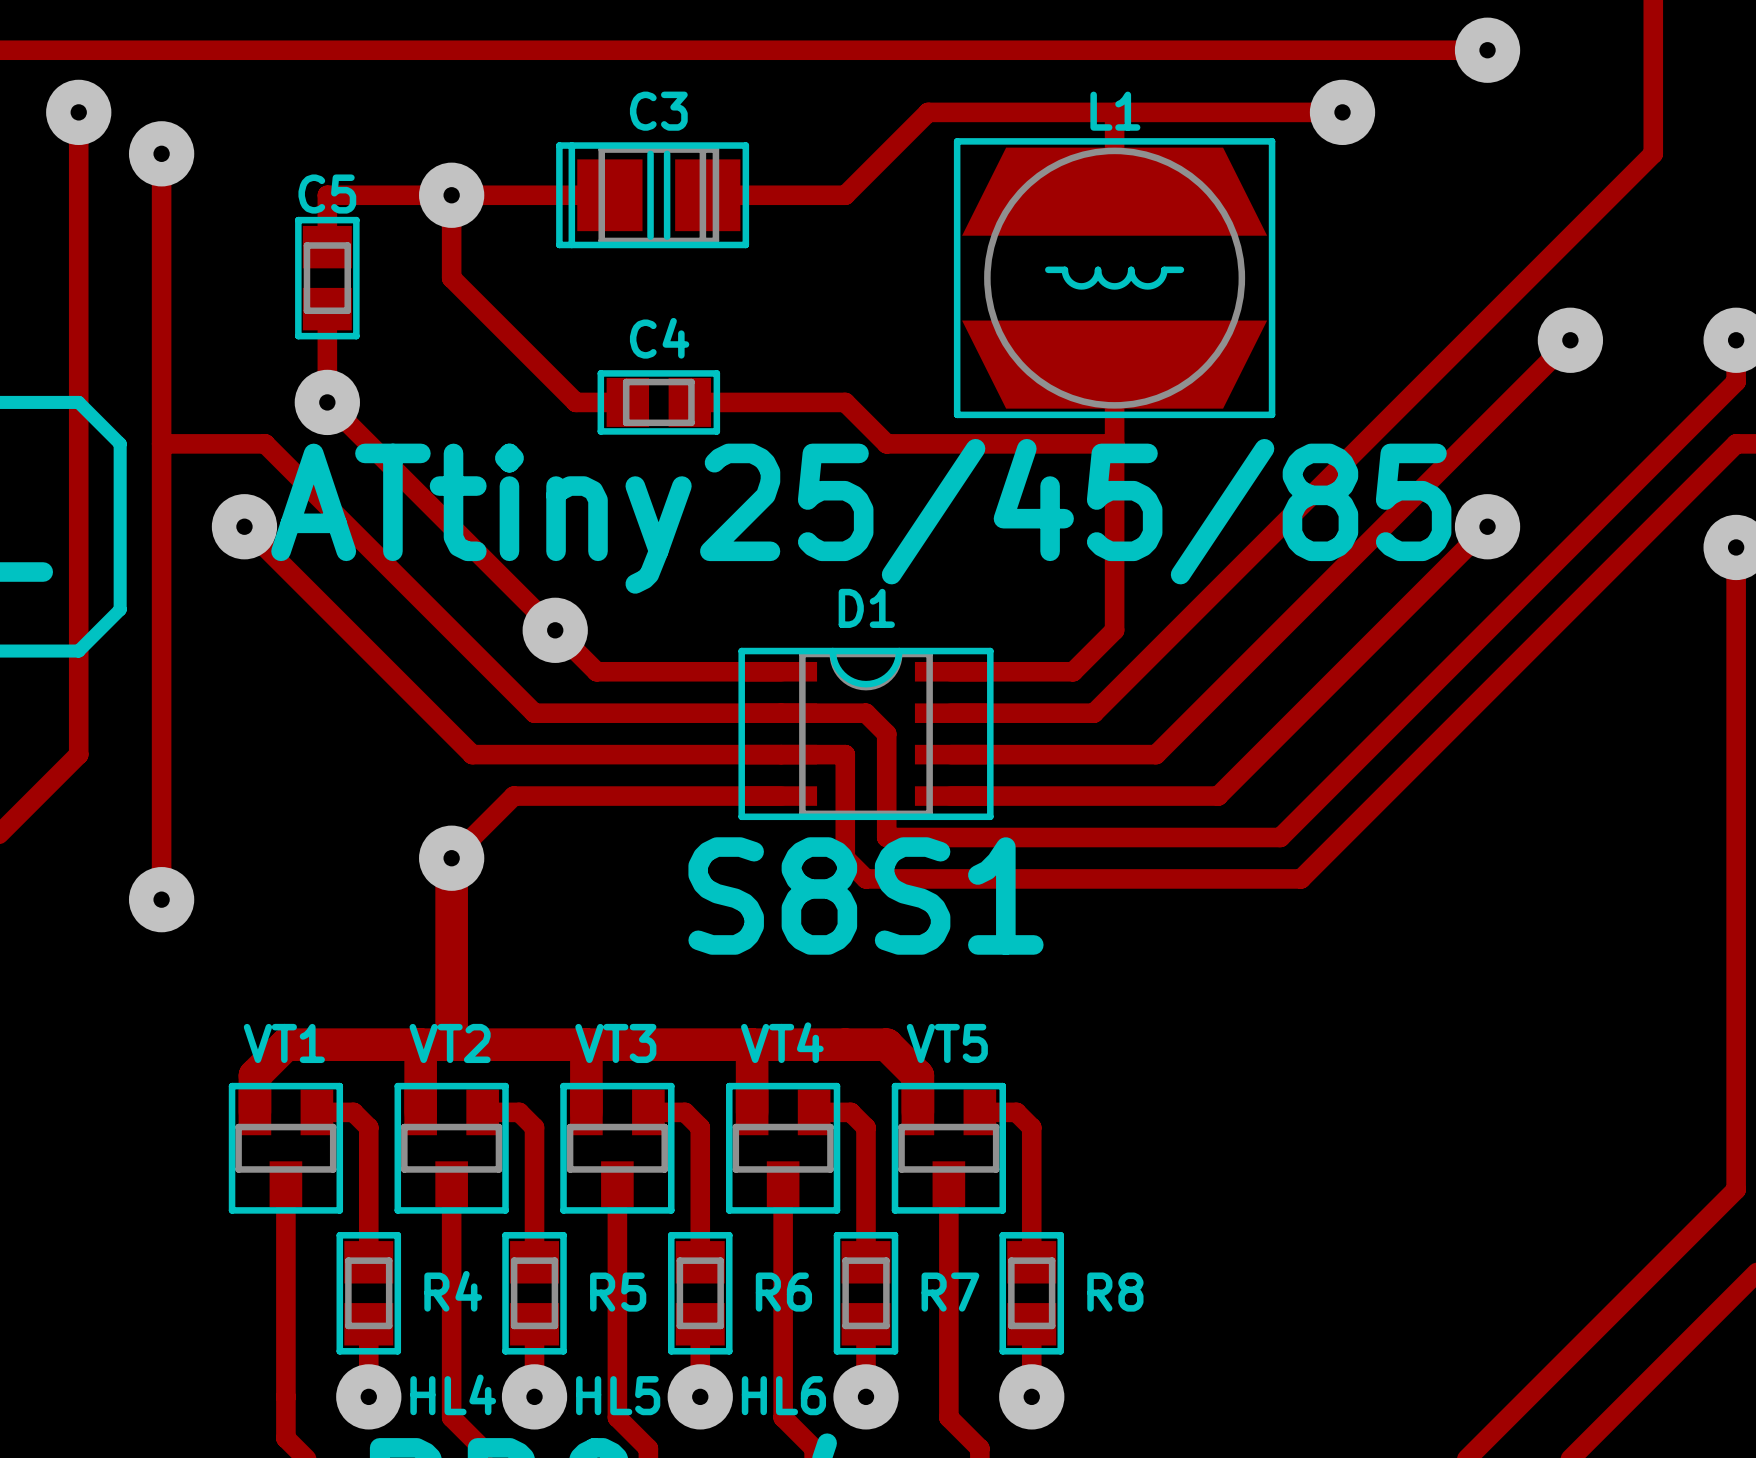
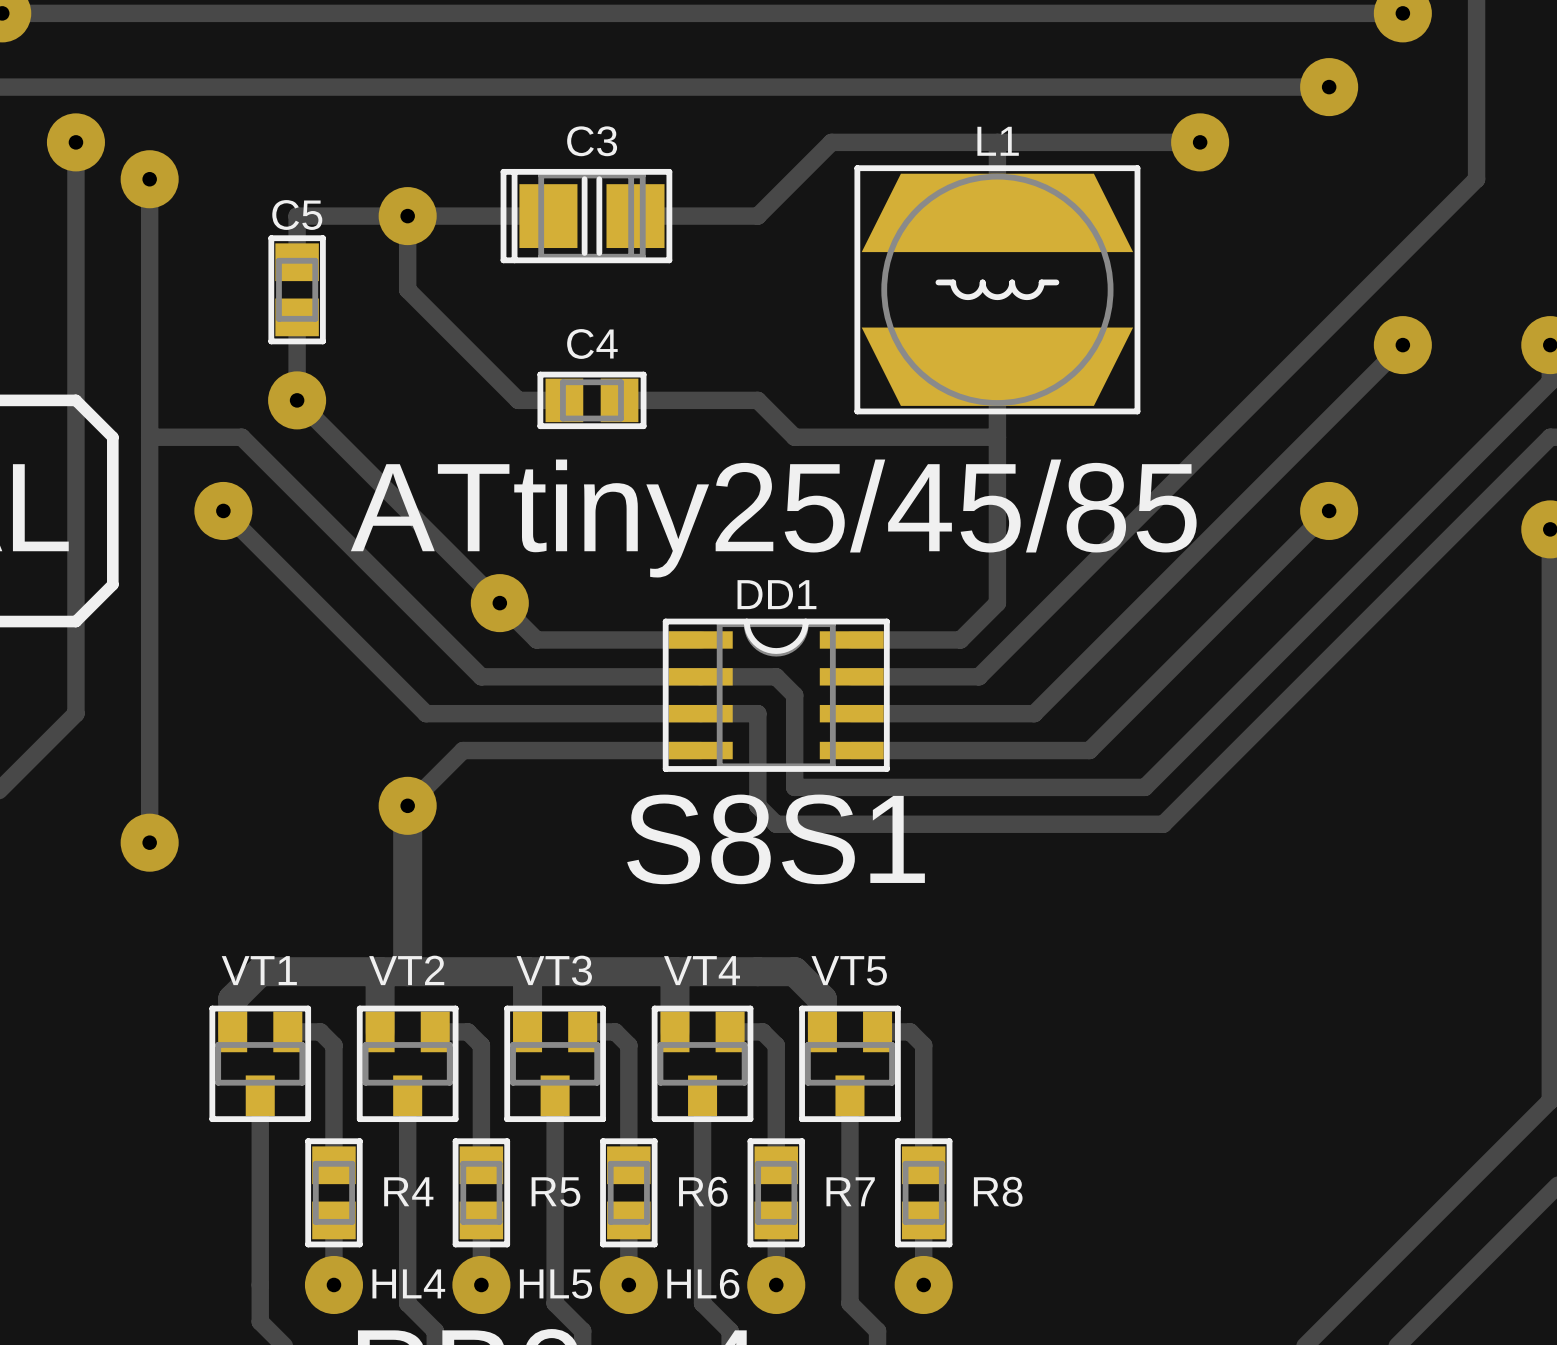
text position: ATtiny25/45/85 (861, 516) -> ATtiny25/45/85 (773, 518)
D1 name: D1 (866, 608) -> DD1 (776, 594)

